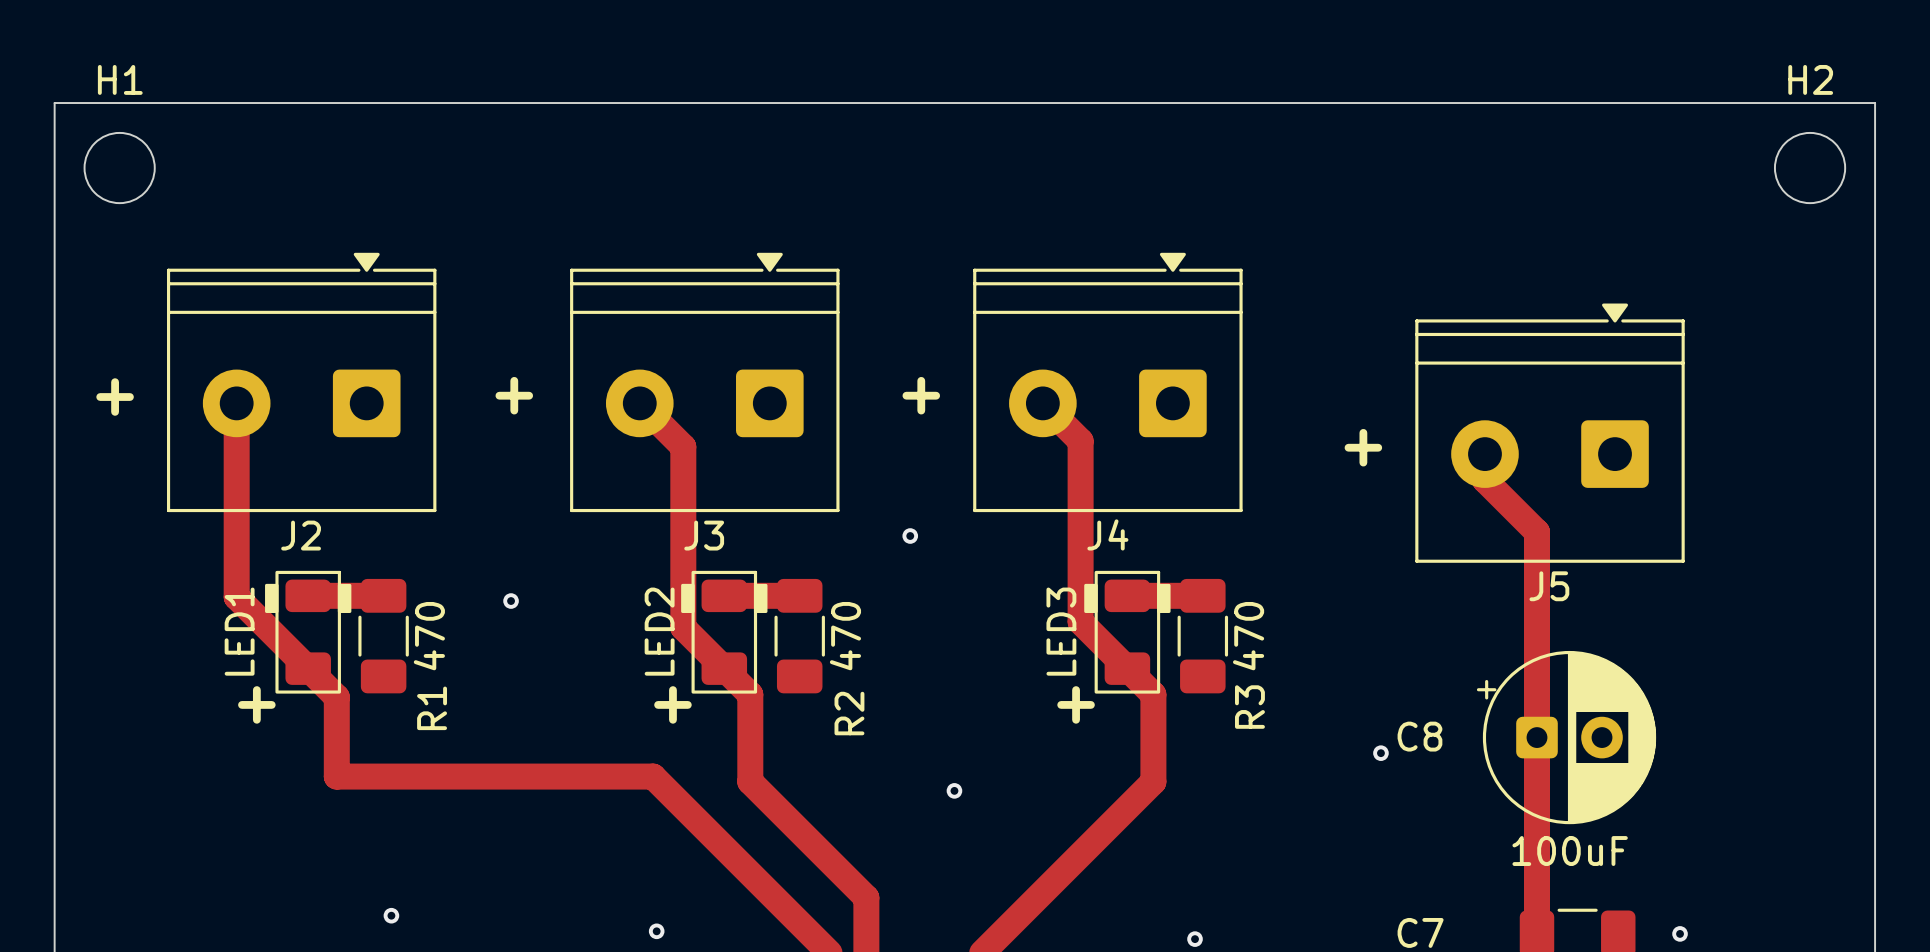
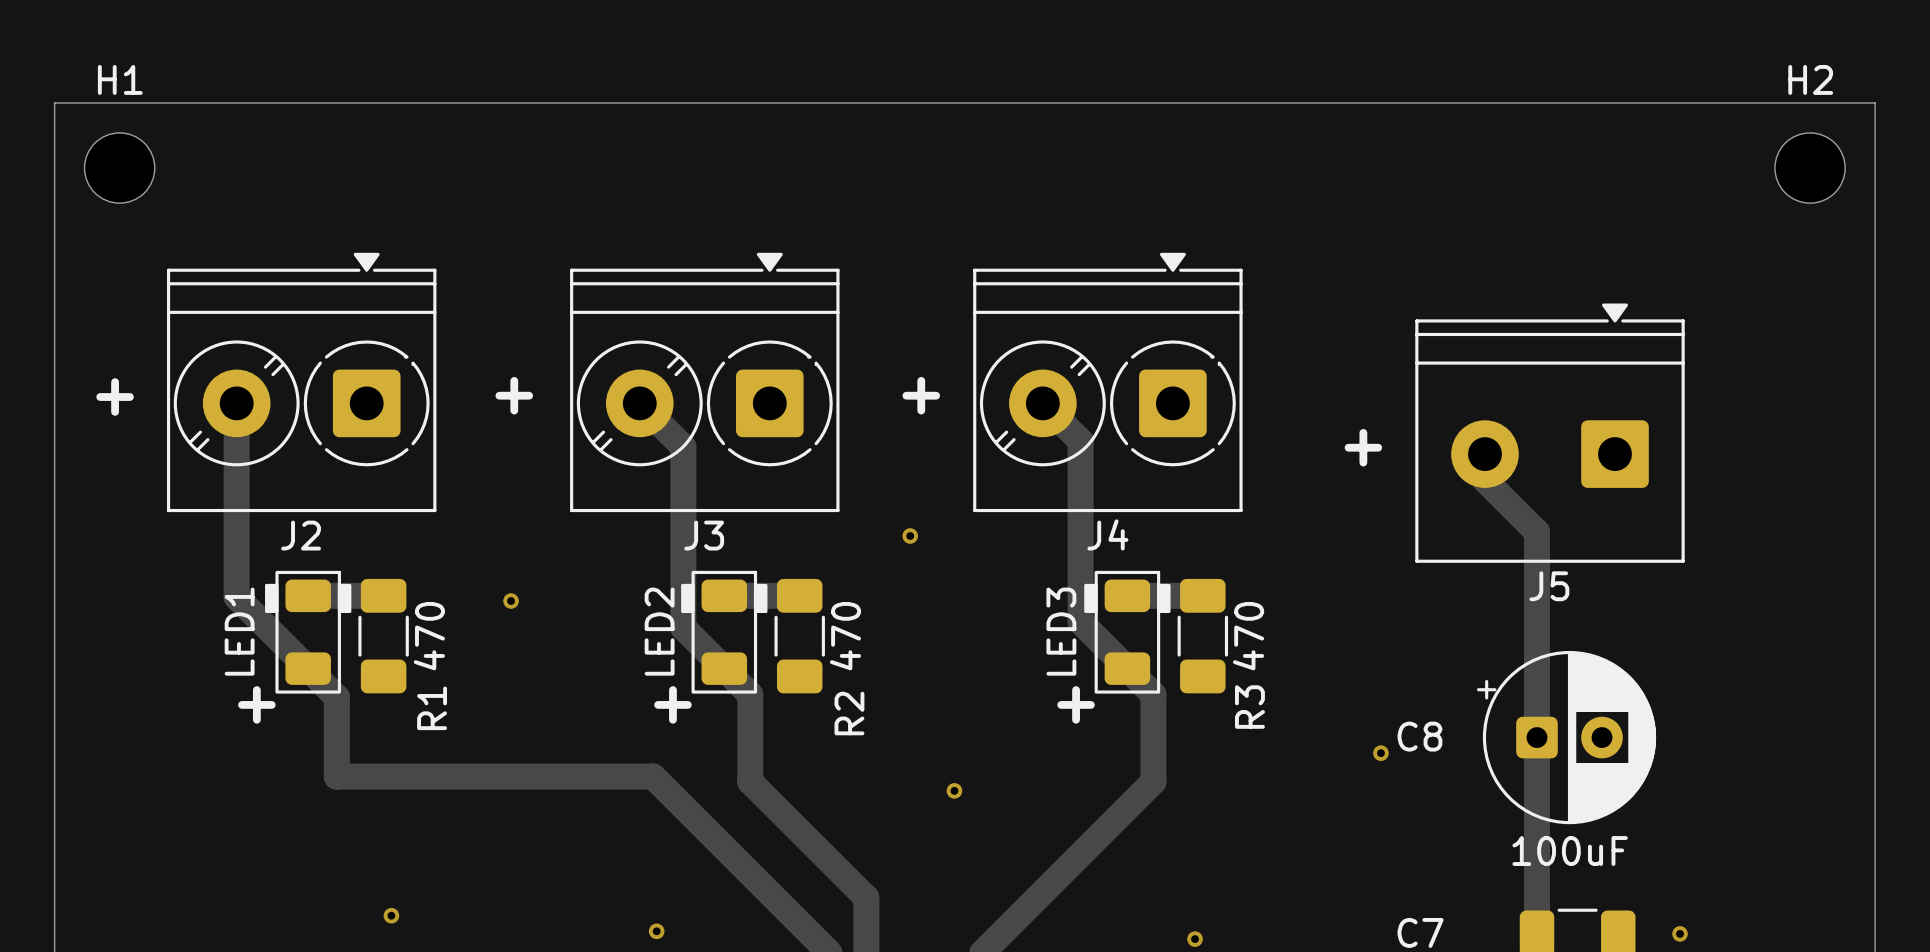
J2 footprint: [166, 252, 437, 513] -> [166, 252, 437, 513]
J3 footprint: [570, 252, 840, 513] -> [570, 252, 840, 513]
J4 footprint: [973, 252, 1243, 513] -> [973, 252, 1243, 513]

